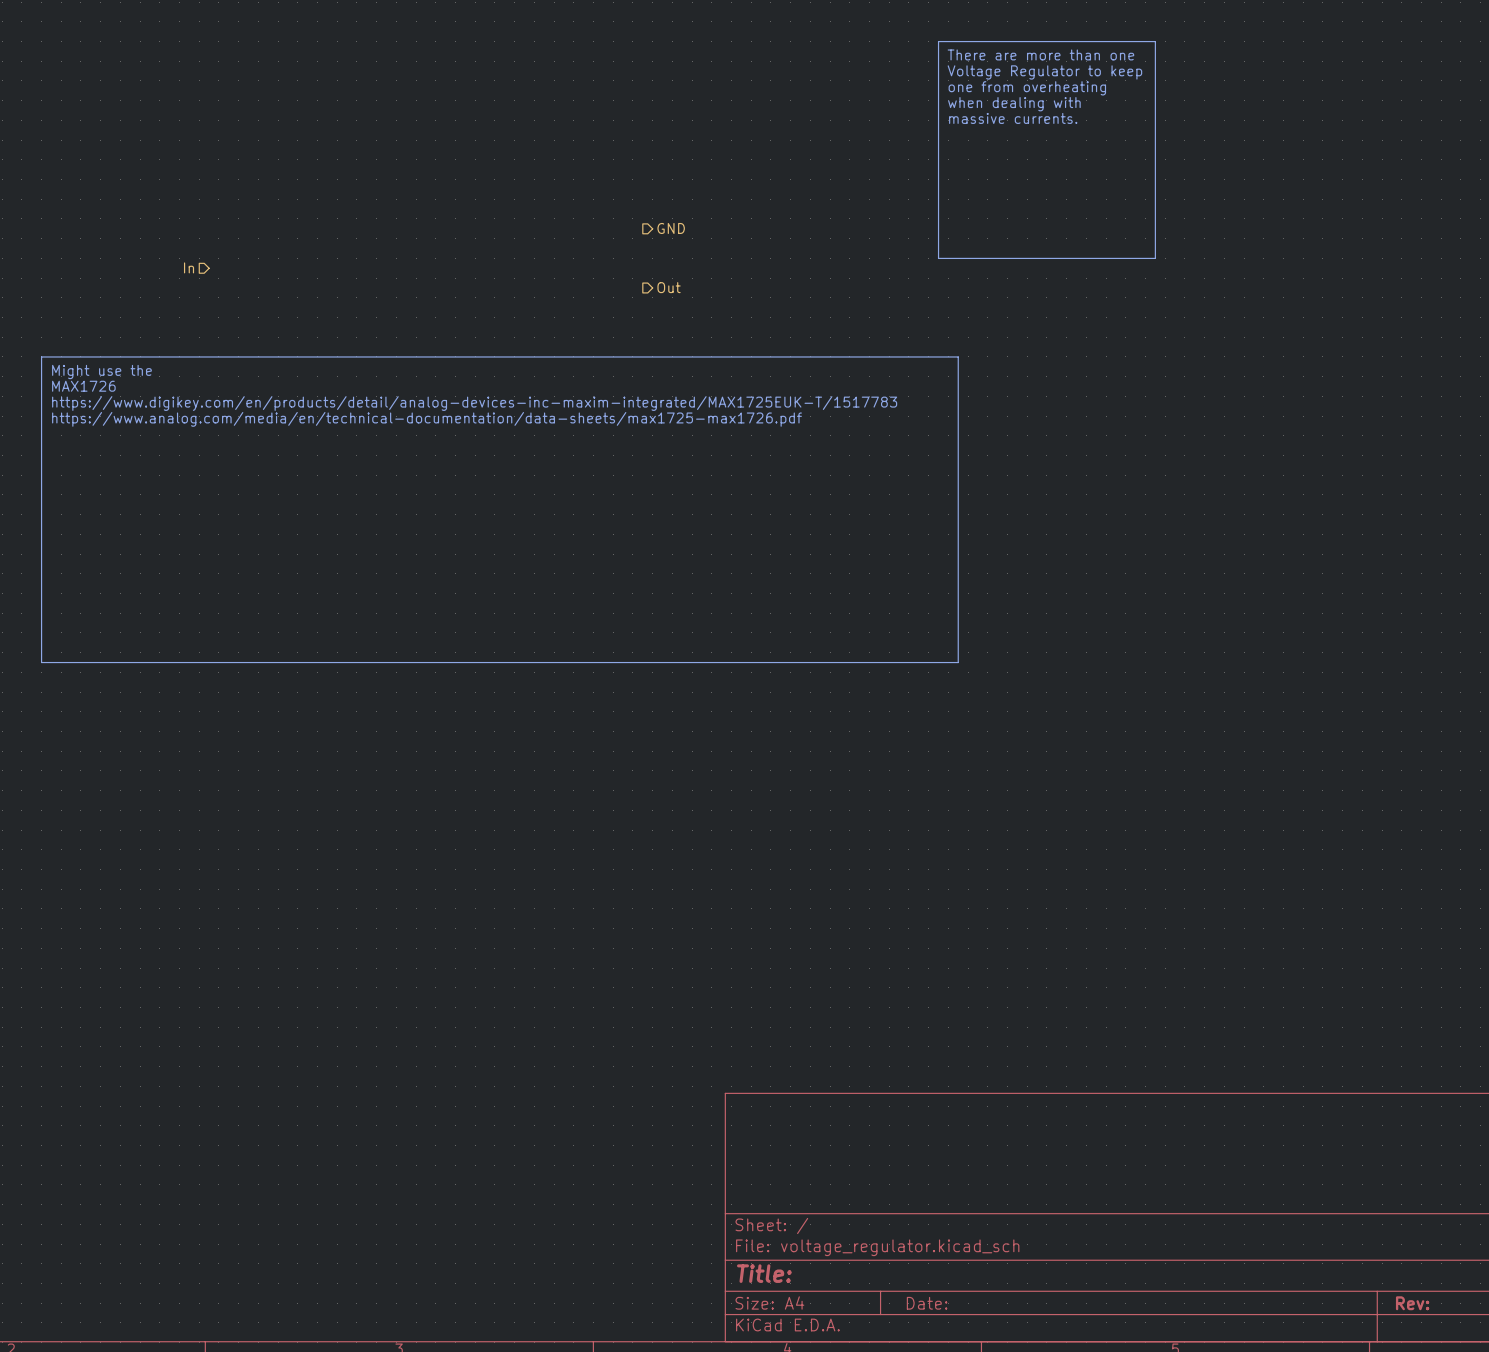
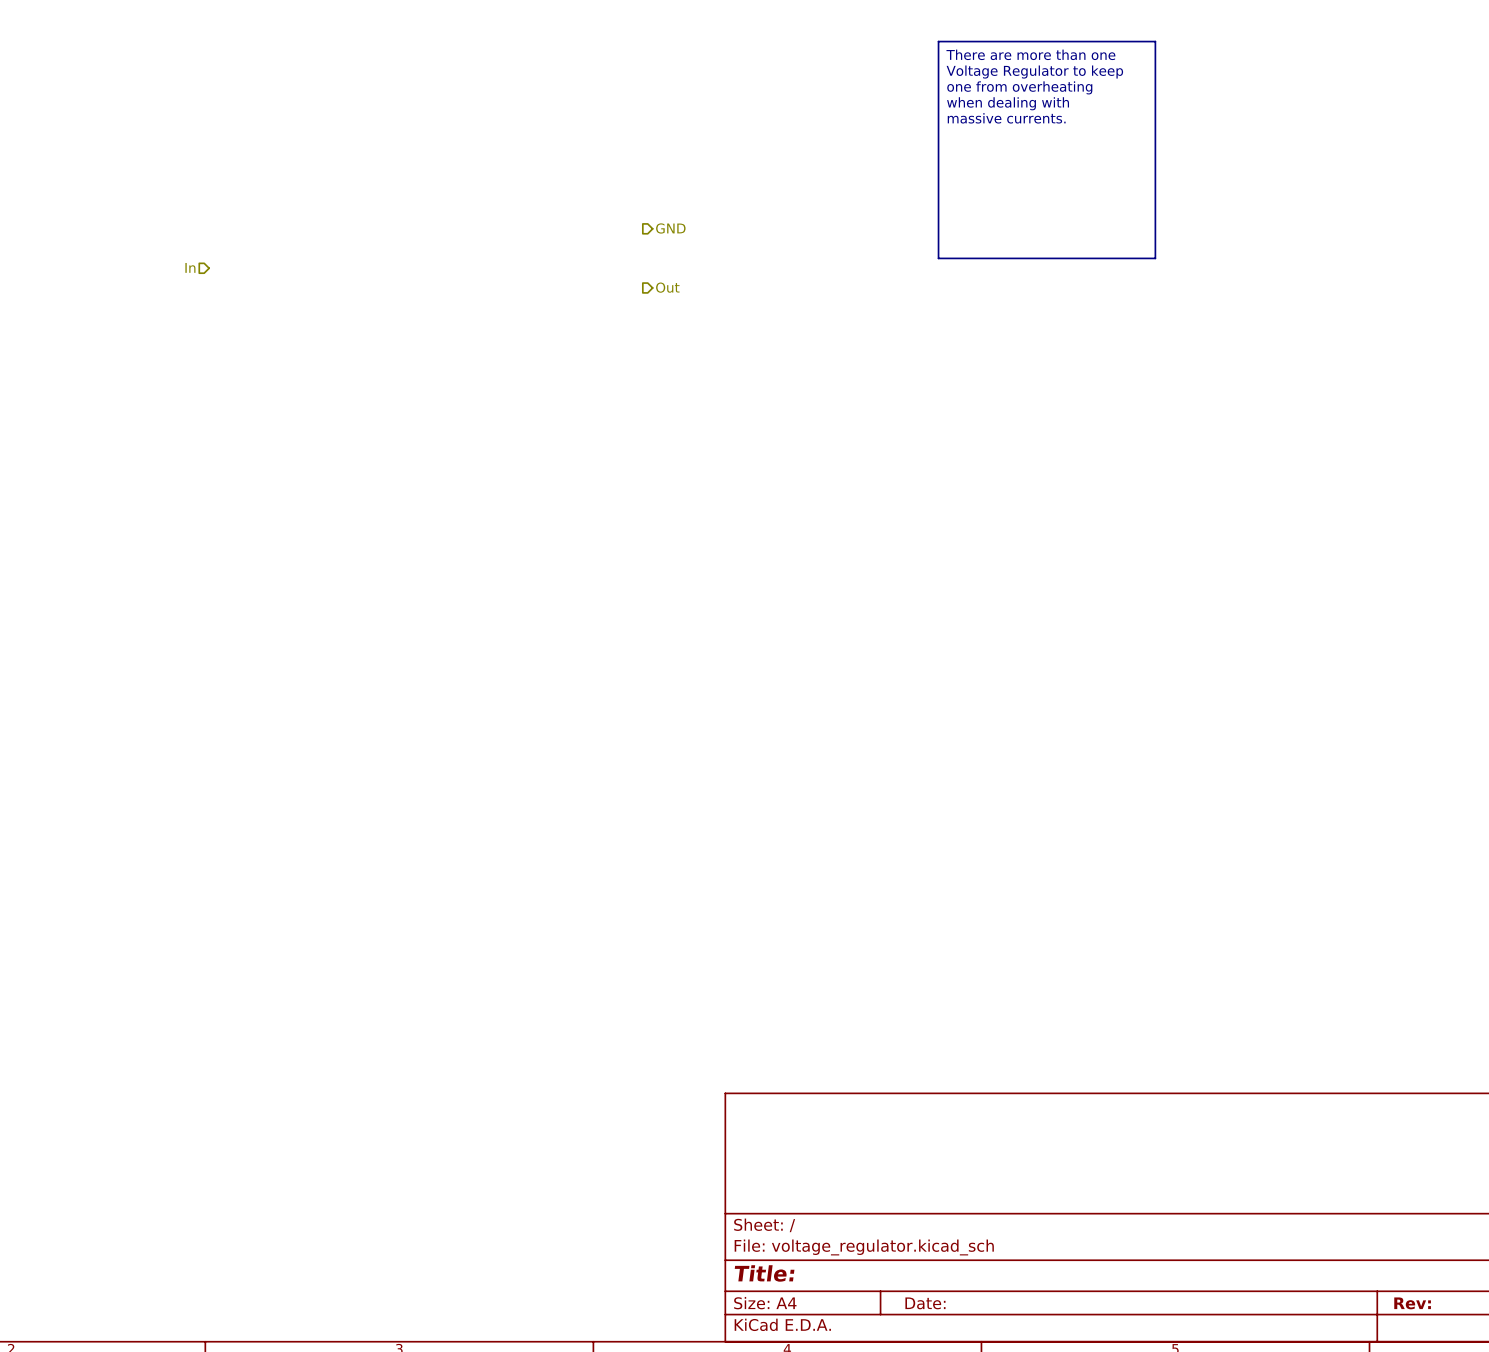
line: (41, 356) (958, 356) (958, 662) (41, 662) (41, 356) -> none
text: Might use the (101, 372) -> none
text: MAX1726 (83, 386) -> none
text: https://www.digikey.com/en/products/detail/analog-devices-inc-maxim-integrated/MAX1725EUK-T/1517783 (474, 403) -> none
text: https://www.analog.com/media/en/technical-documentation/data-sheets/max1725-max1726.pdf (427, 419) -> none

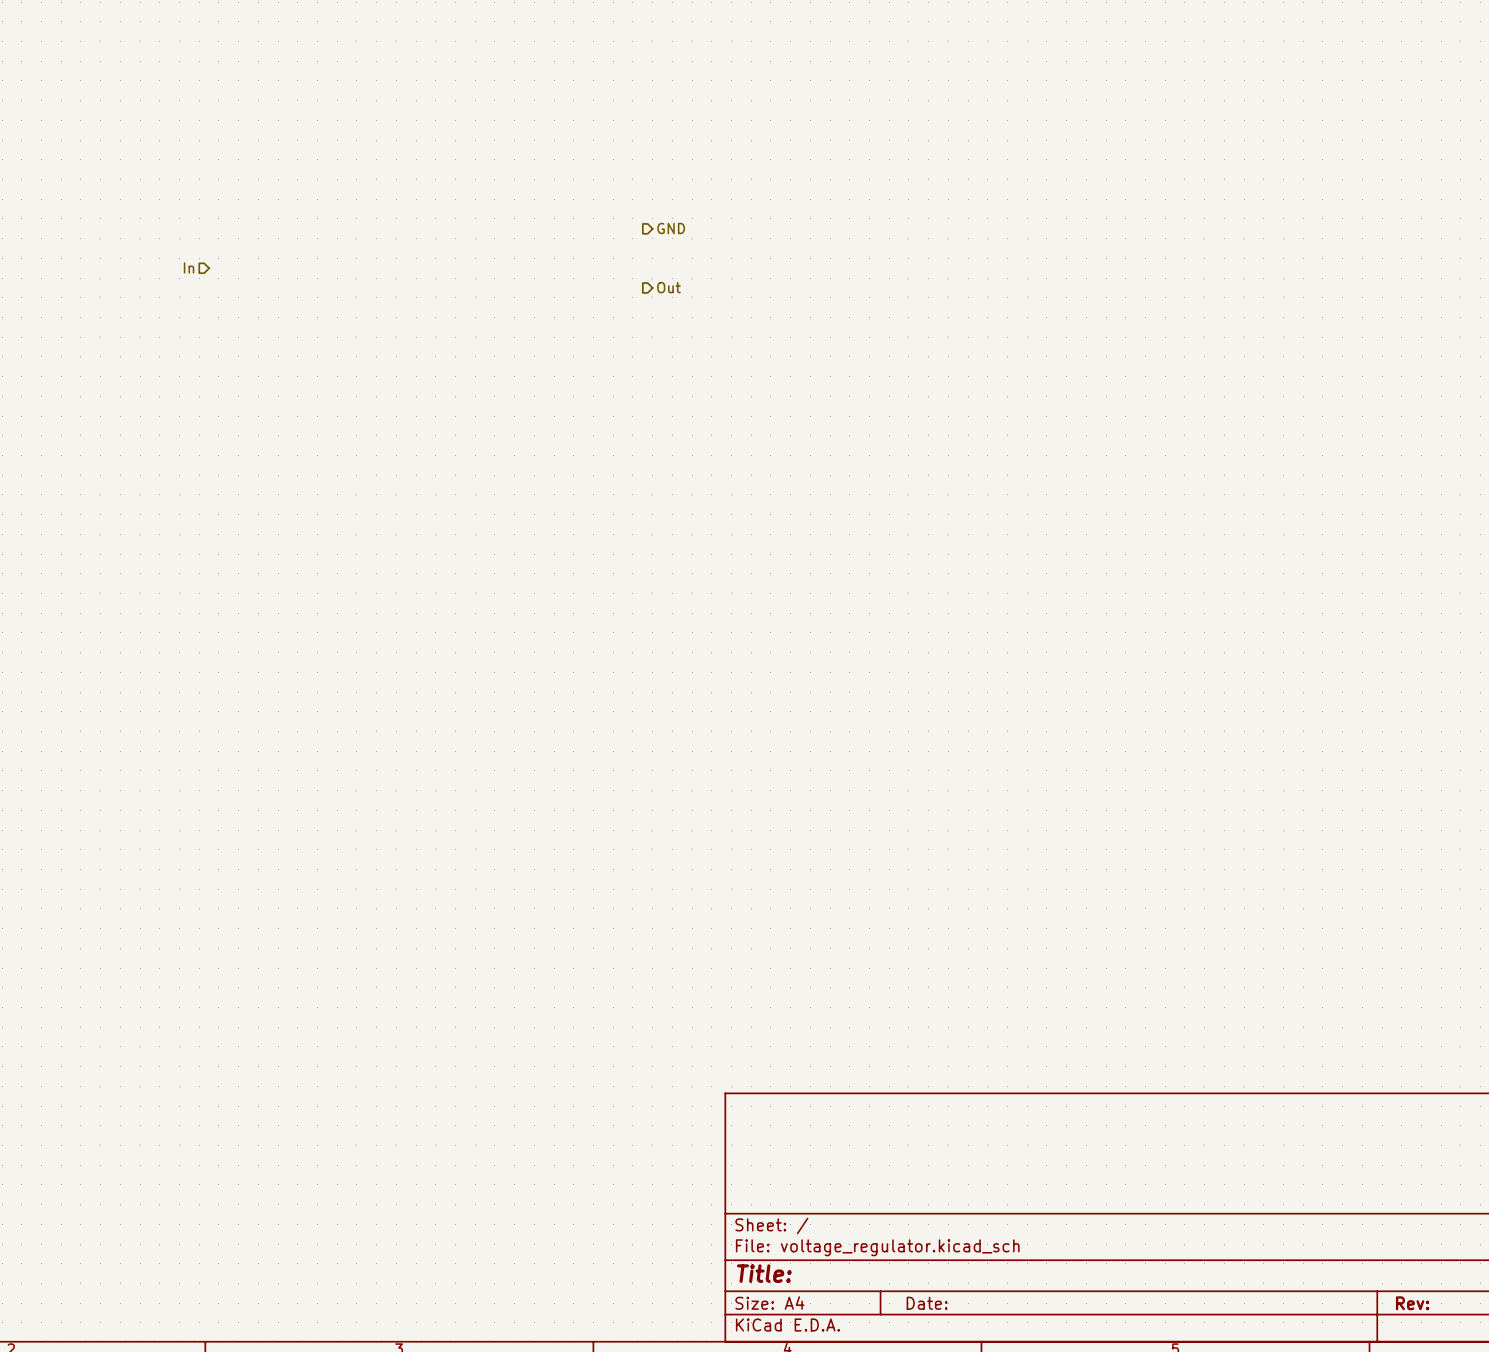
line: (938, 41) (1155, 41) (1155, 258) (938, 258) (938, 41) -> none
text: There are more than one (1030, 54) -> none
text: Voltage Regulator to keep (1034, 72) -> none
text: one from overheating (1019, 87) -> none
text: when dealing with (1008, 103) -> none
text: massive currents. (1006, 118) -> none

